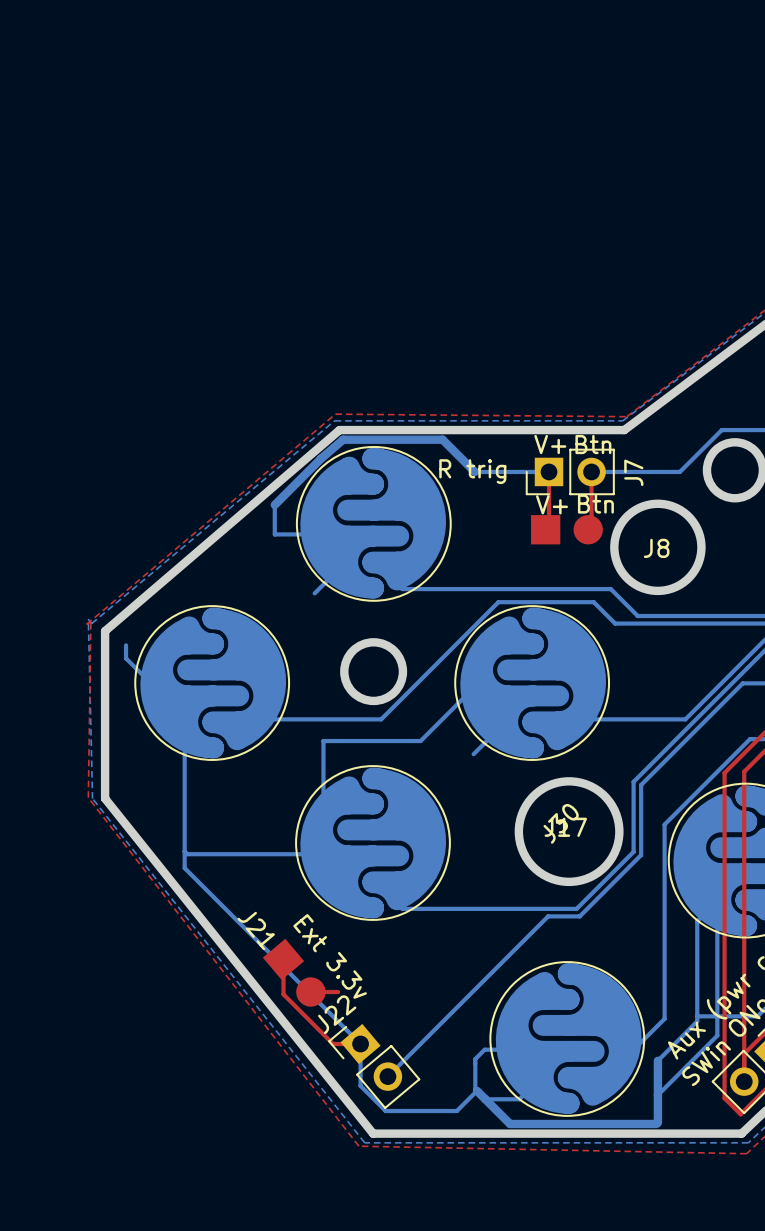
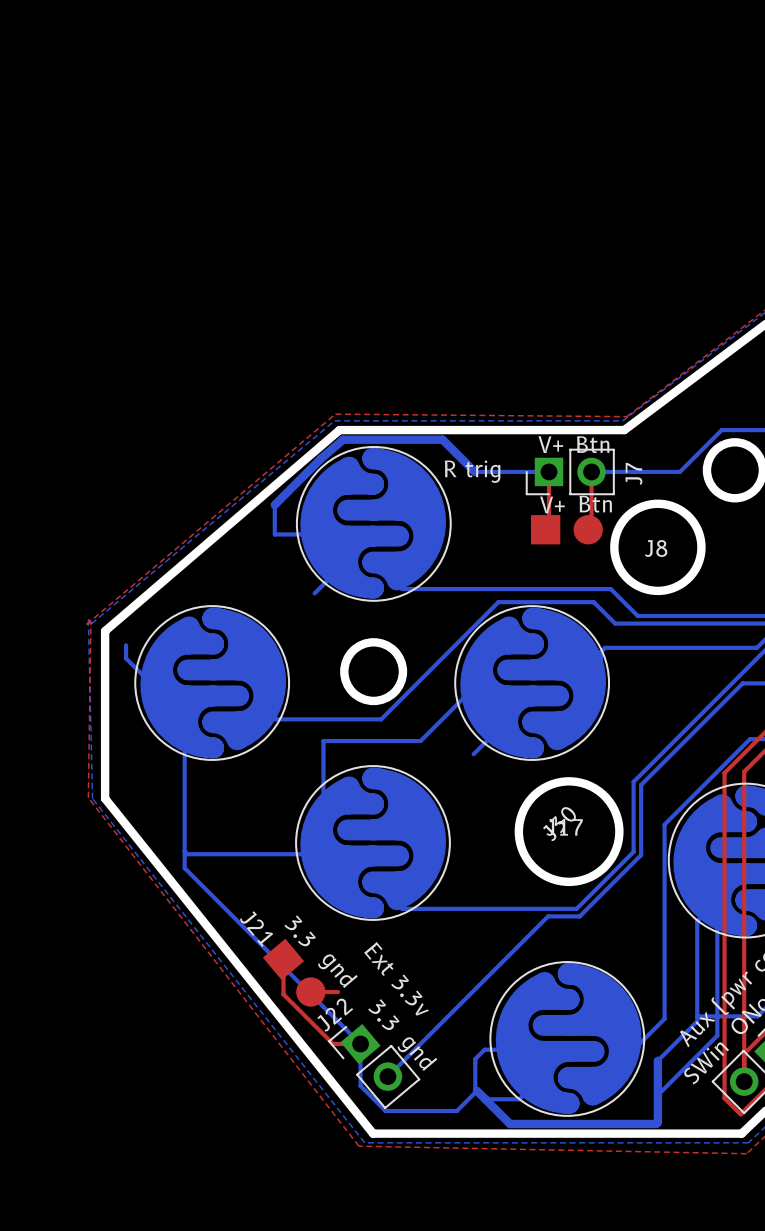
bottom track: (756, 647) (685, 719) (574, 719) -> (756, 647) (605, 647) (600, 652) (600, 693) (574, 719)
text: none -> 3.3 (300, 930)
text: Ext 3.3v (330, 956) -> gnd (337, 971)
text: none -> Ext 3.3v (396, 978)
text: none -> 3.3 (383, 1014)
text: none -> gnd (417, 1054)

